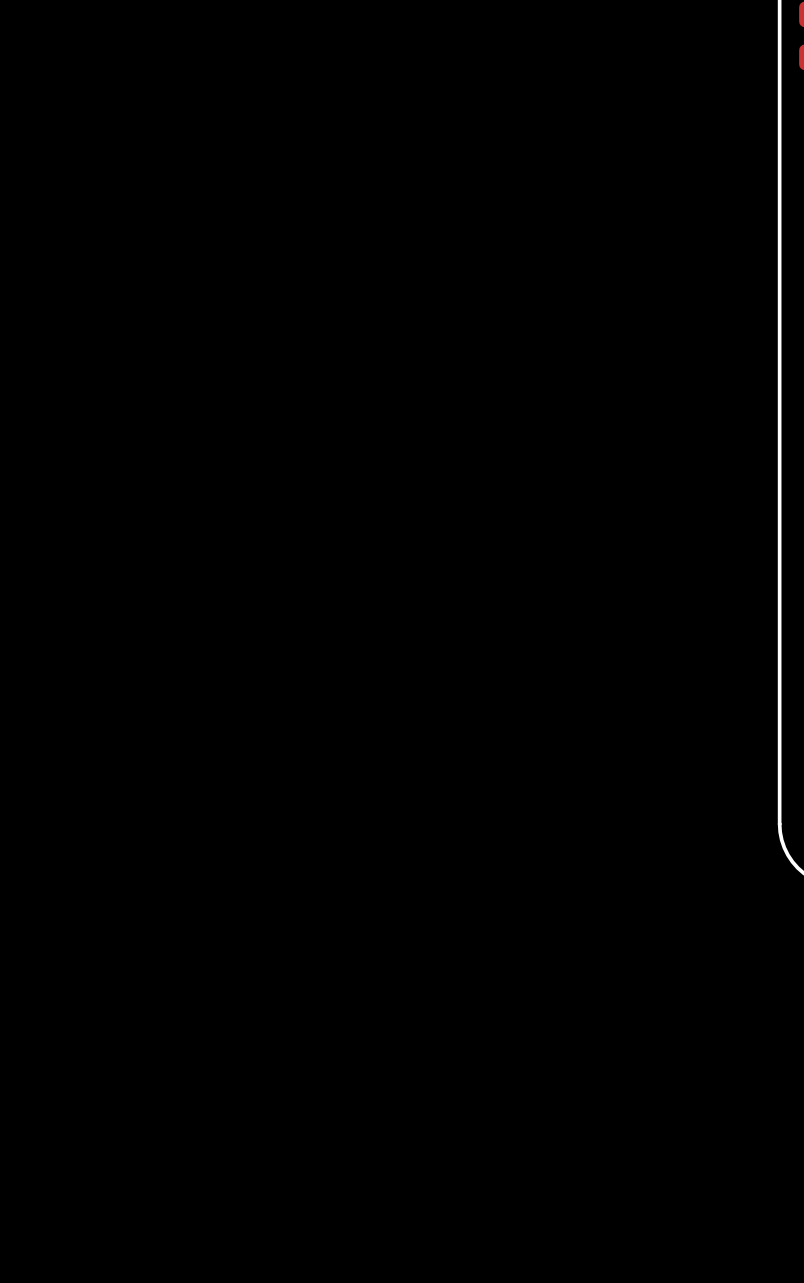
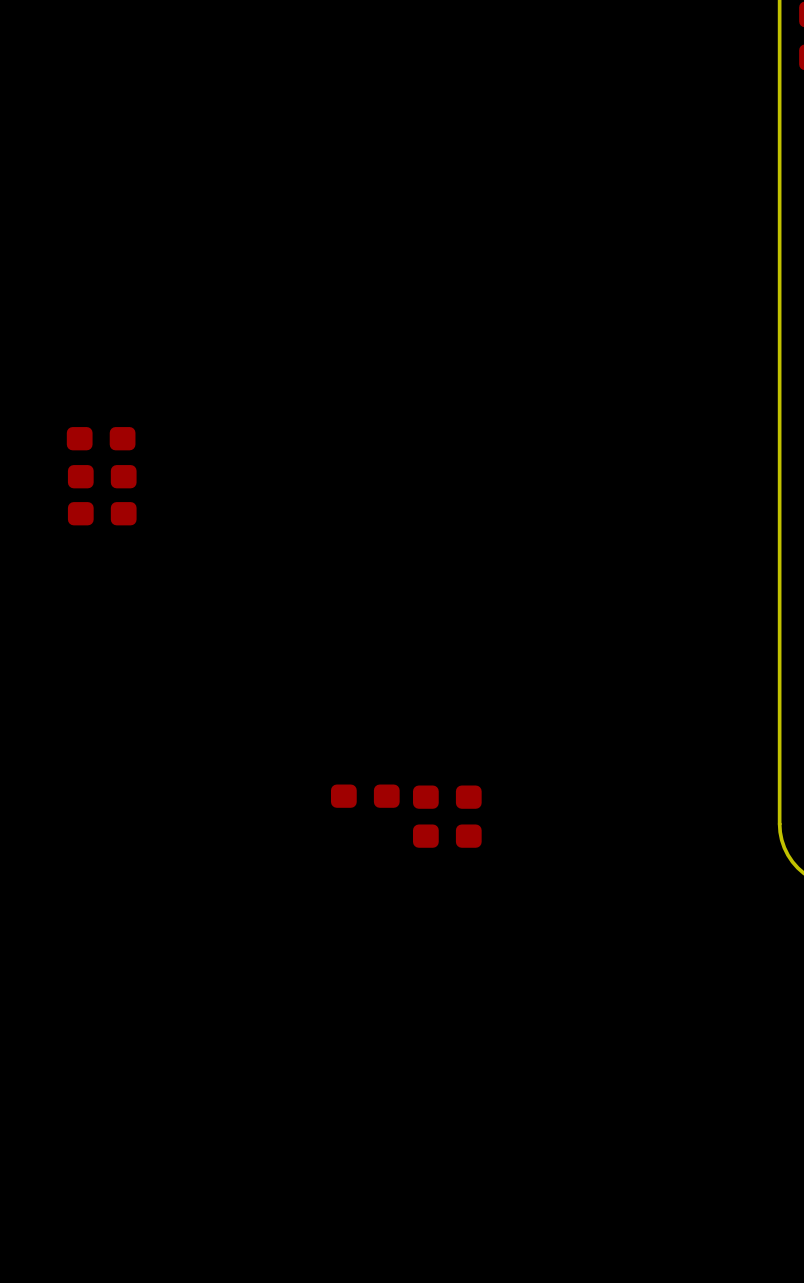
part: none -> (101, 438)
part: none -> (102, 476)
part: none -> (102, 513)
part: none -> (365, 796)
part: none -> (447, 797)
part: none -> (447, 836)

